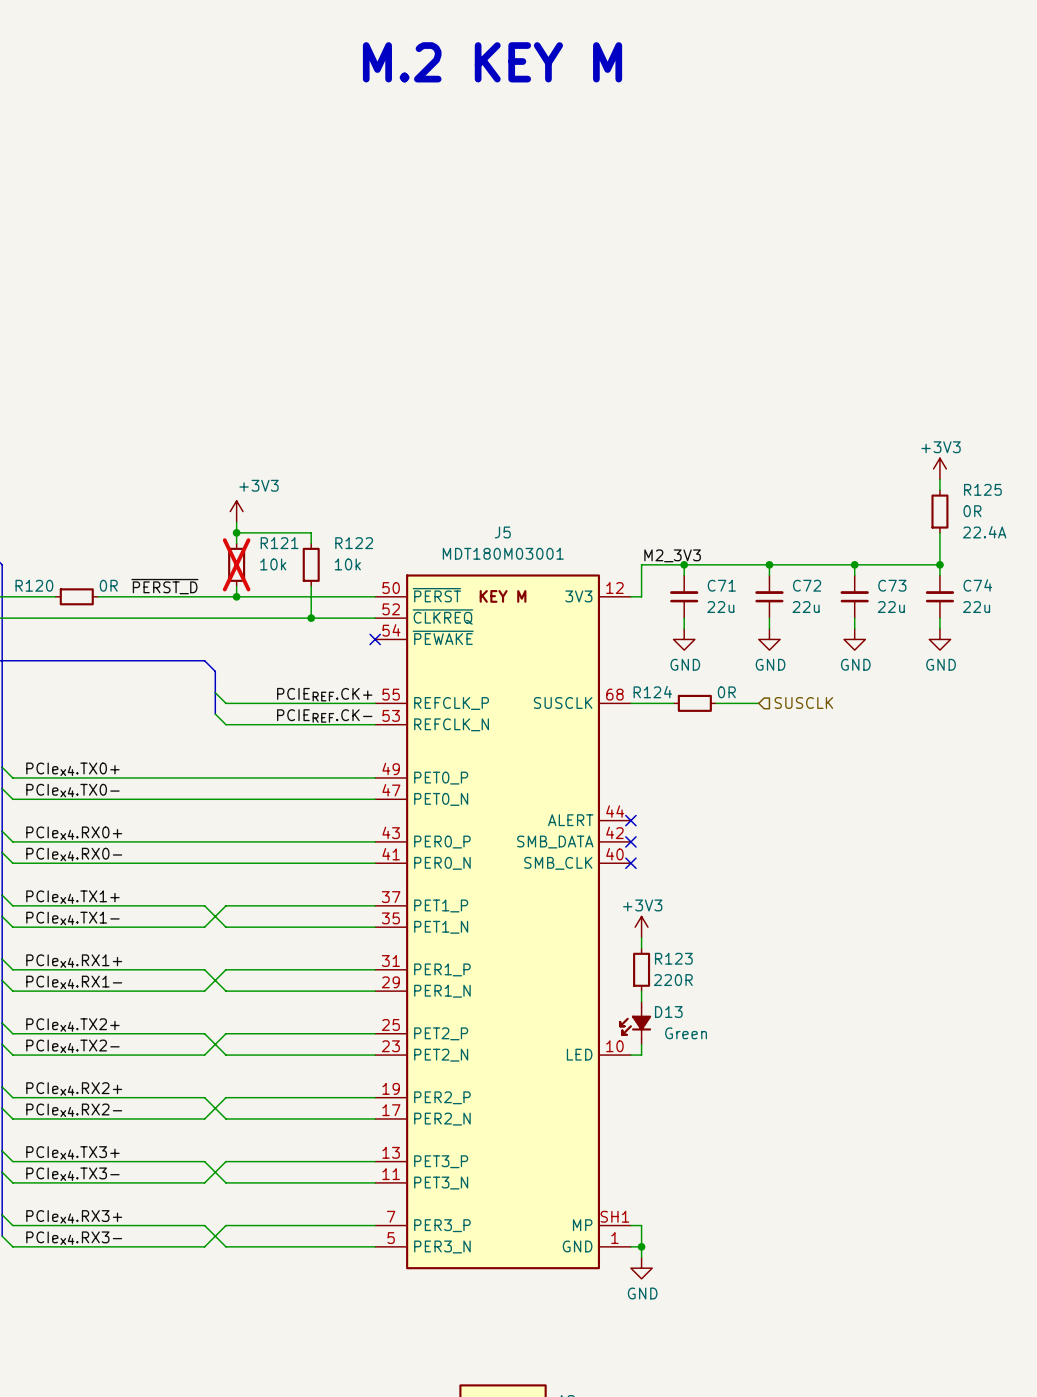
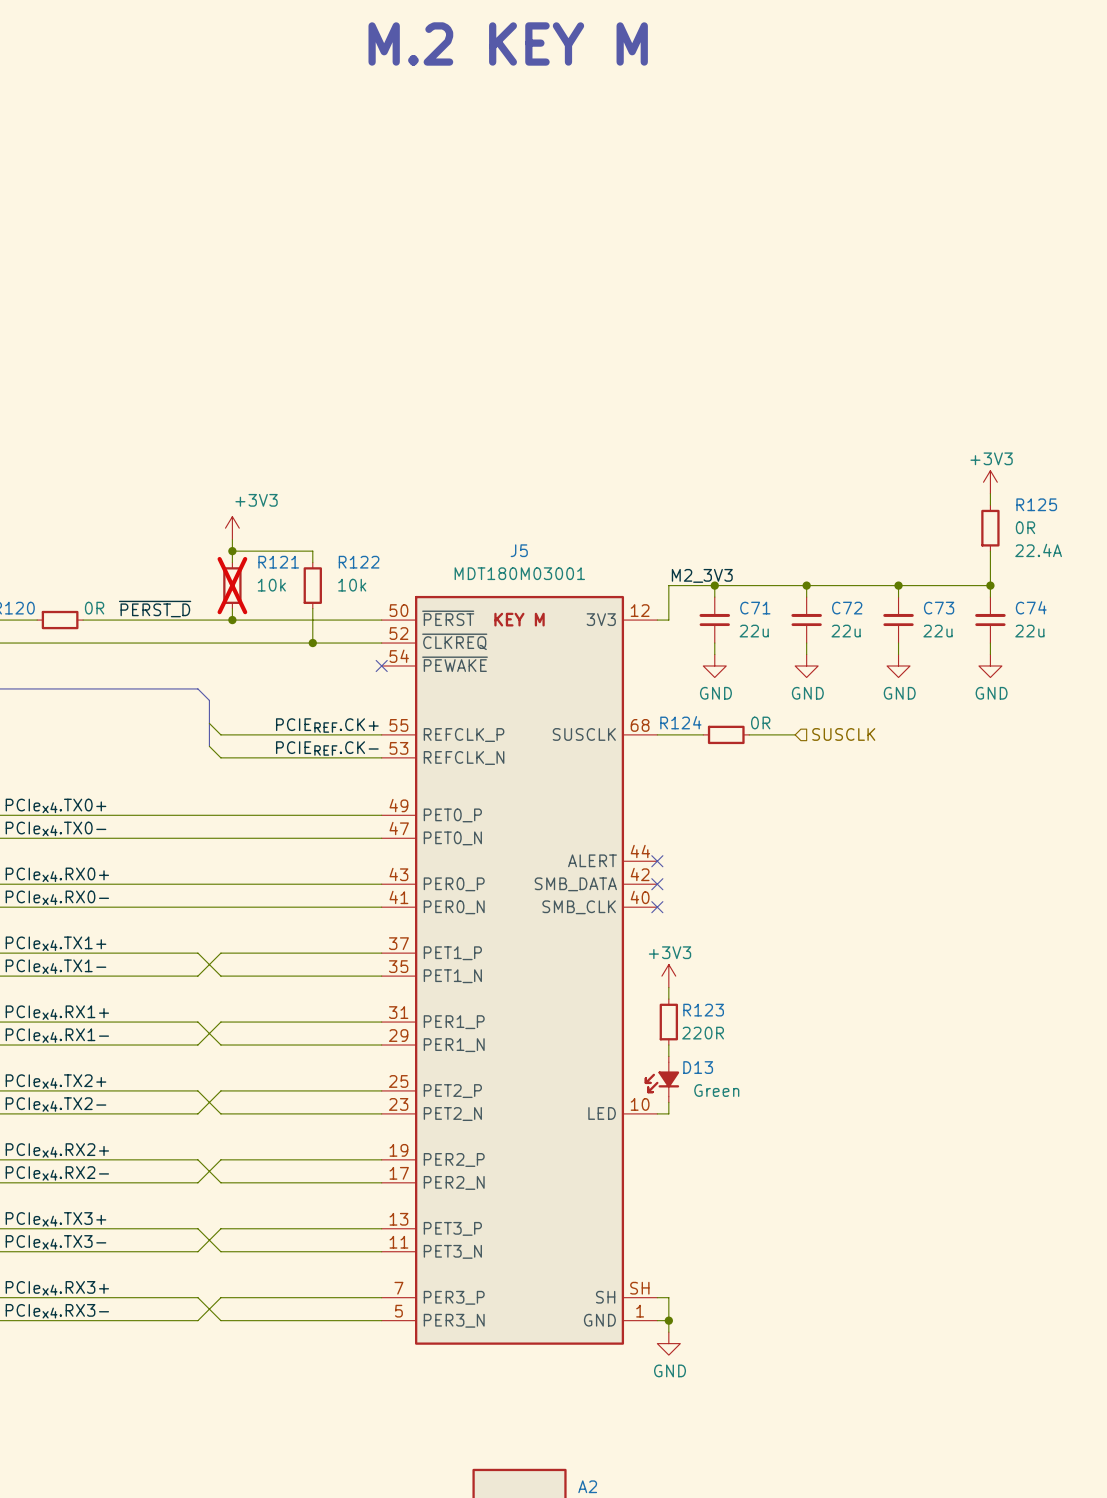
J5 pin number: SH1 (614, 1216) -> SH (639, 1288)
J5 pin name: MP (582, 1225) -> SH (605, 1297)

